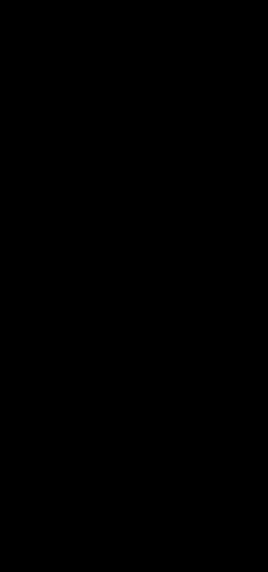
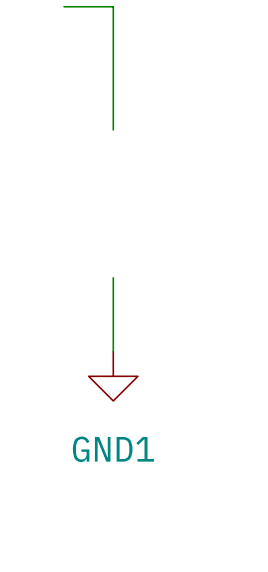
wire: none -> (64, 6) (113, 6) (113, 129)
wire: none -> (113, 277) (113, 351)
power symbol: none -> GND1 (113, 376)

